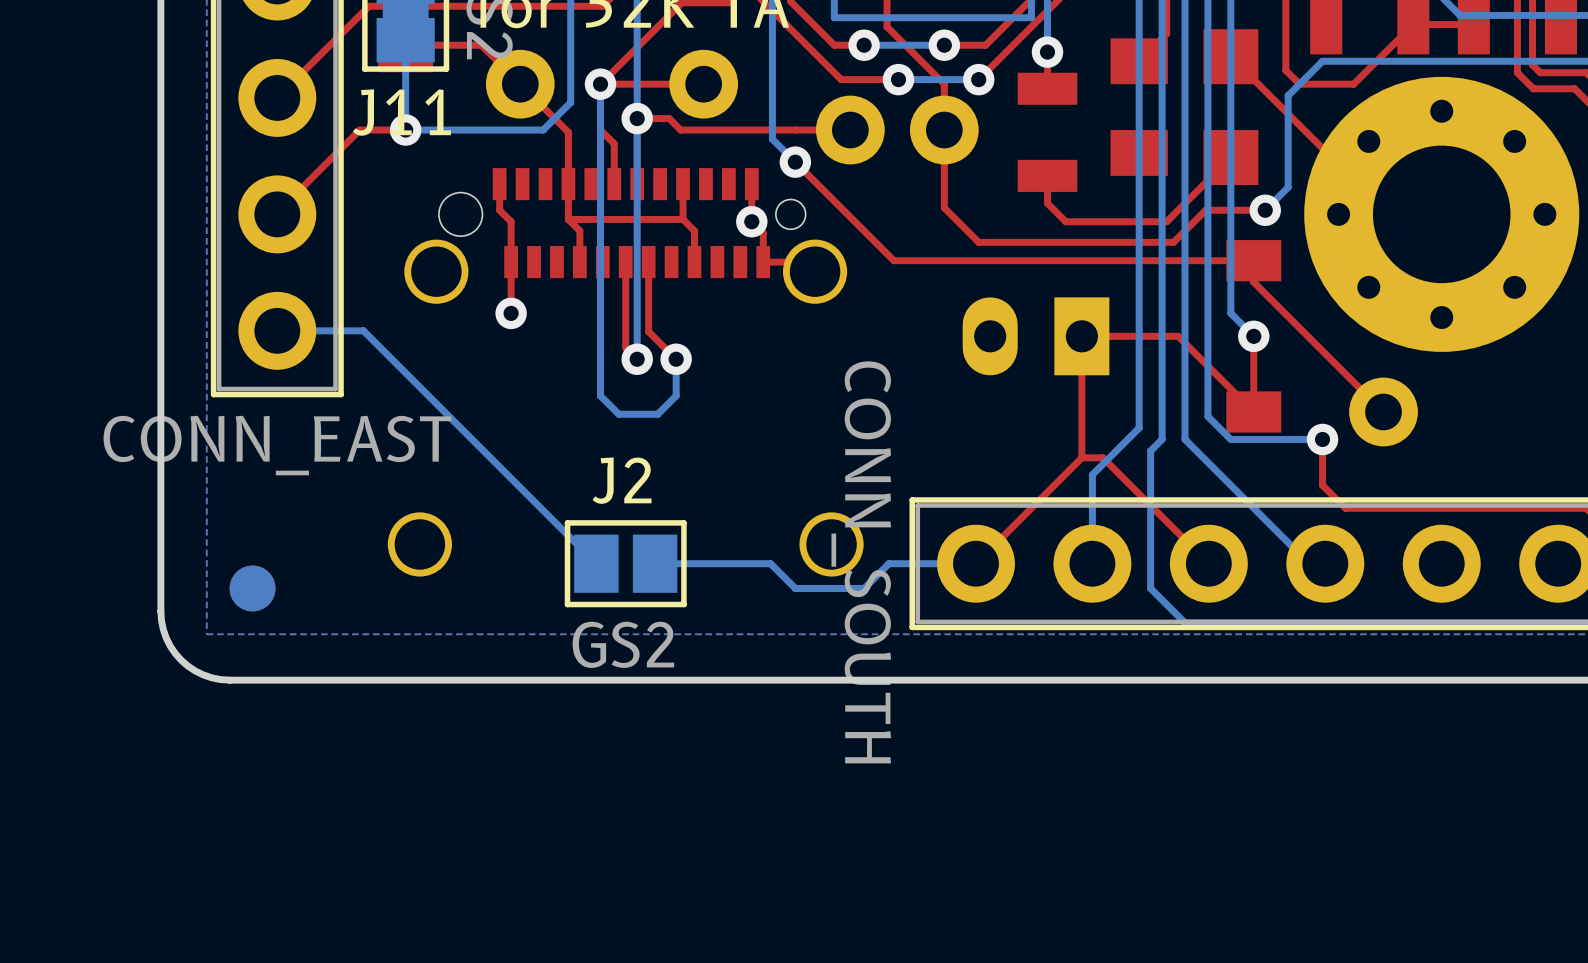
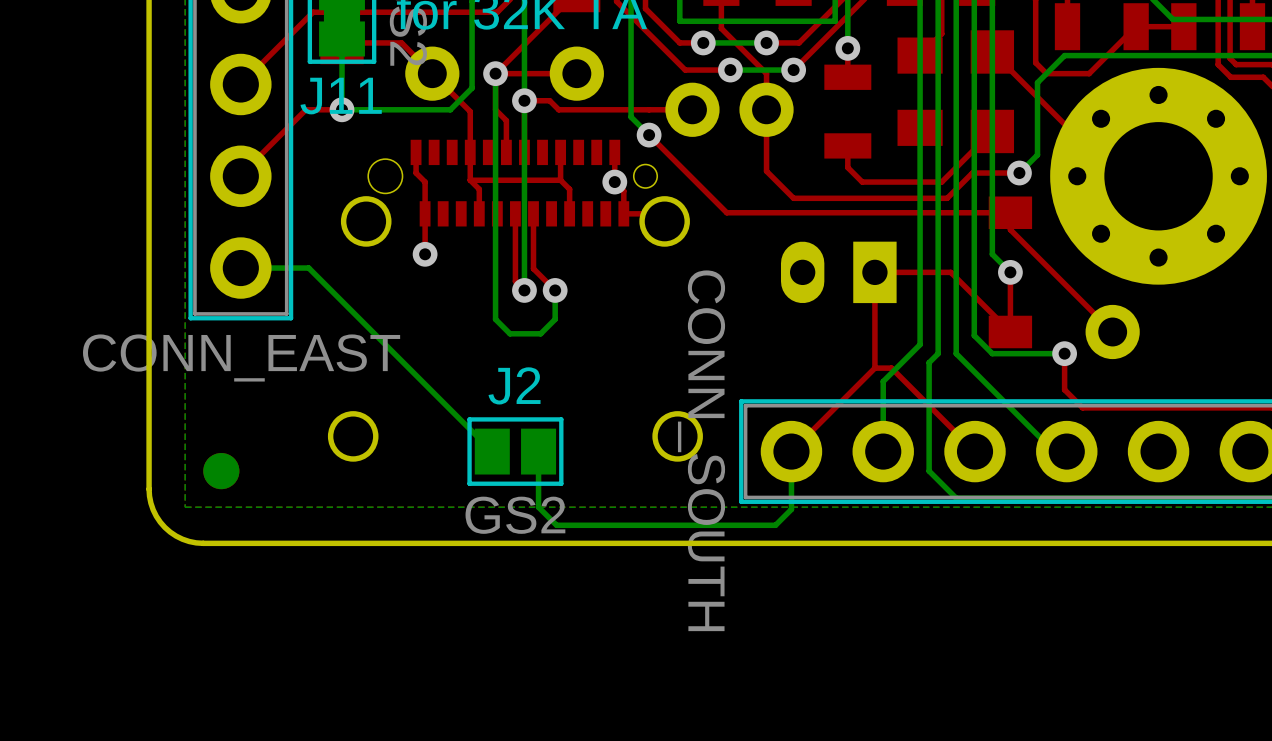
bottom track: (975, 563) (888, 563) (864, 588) (795, 588) (770, 563) (655, 563) -> (791, 451) (791, 509) (775, 525) (556, 525) (538, 507) (538, 451)

